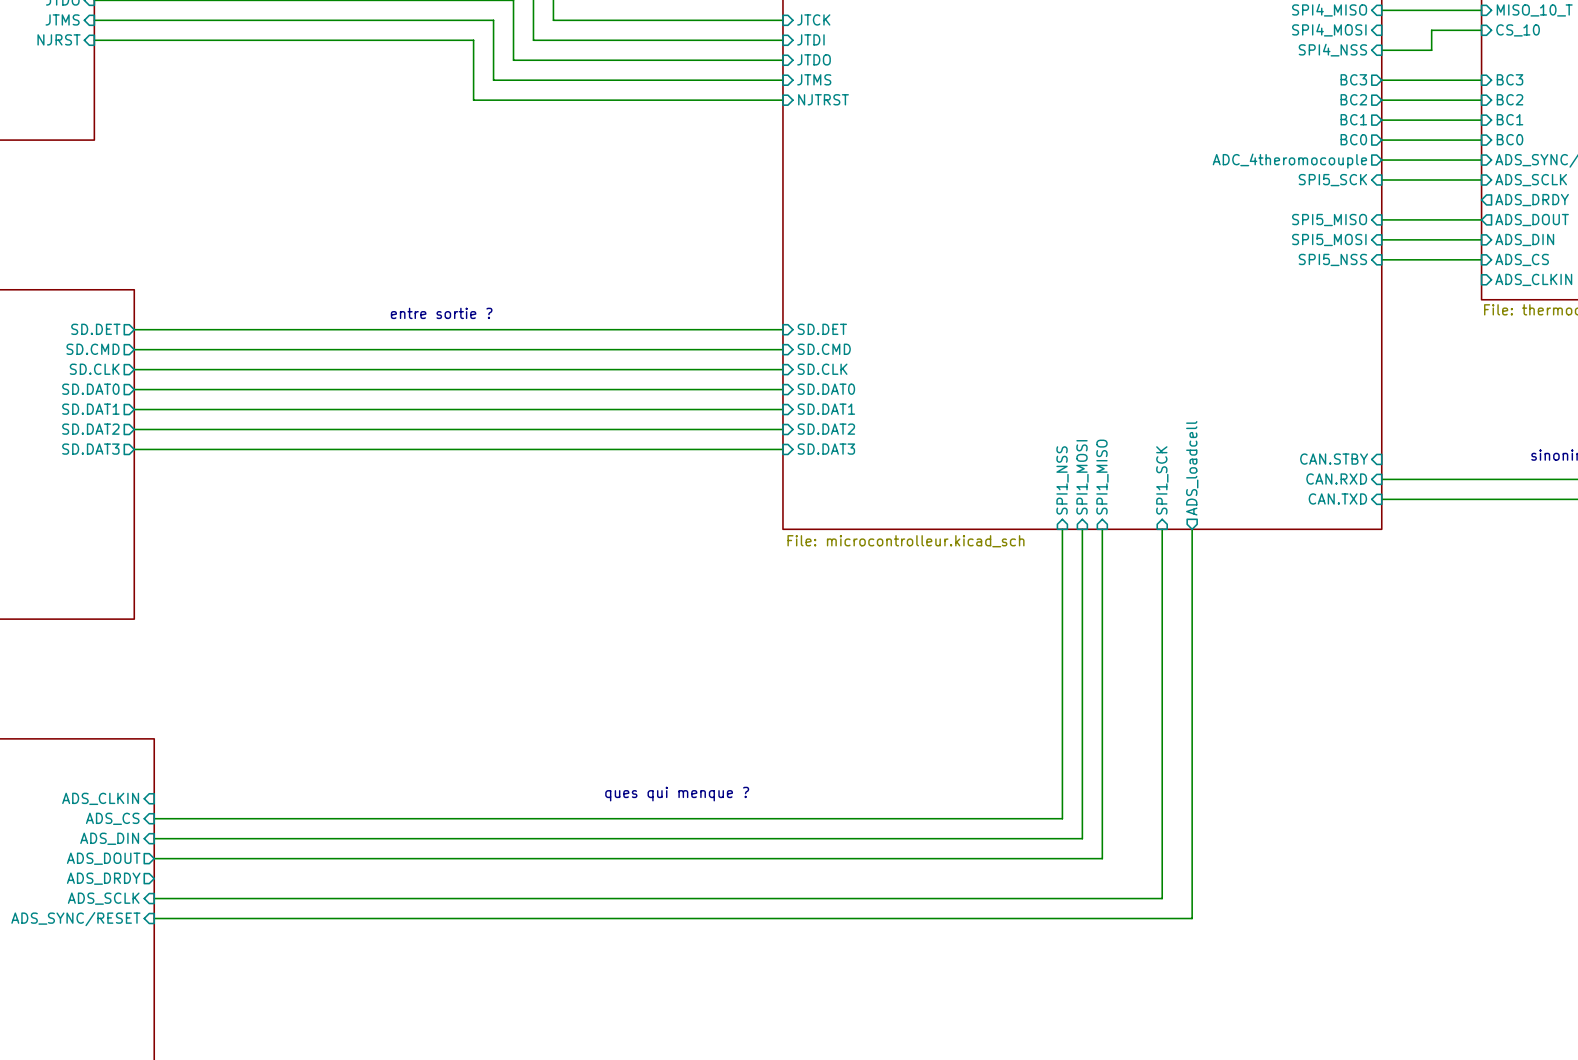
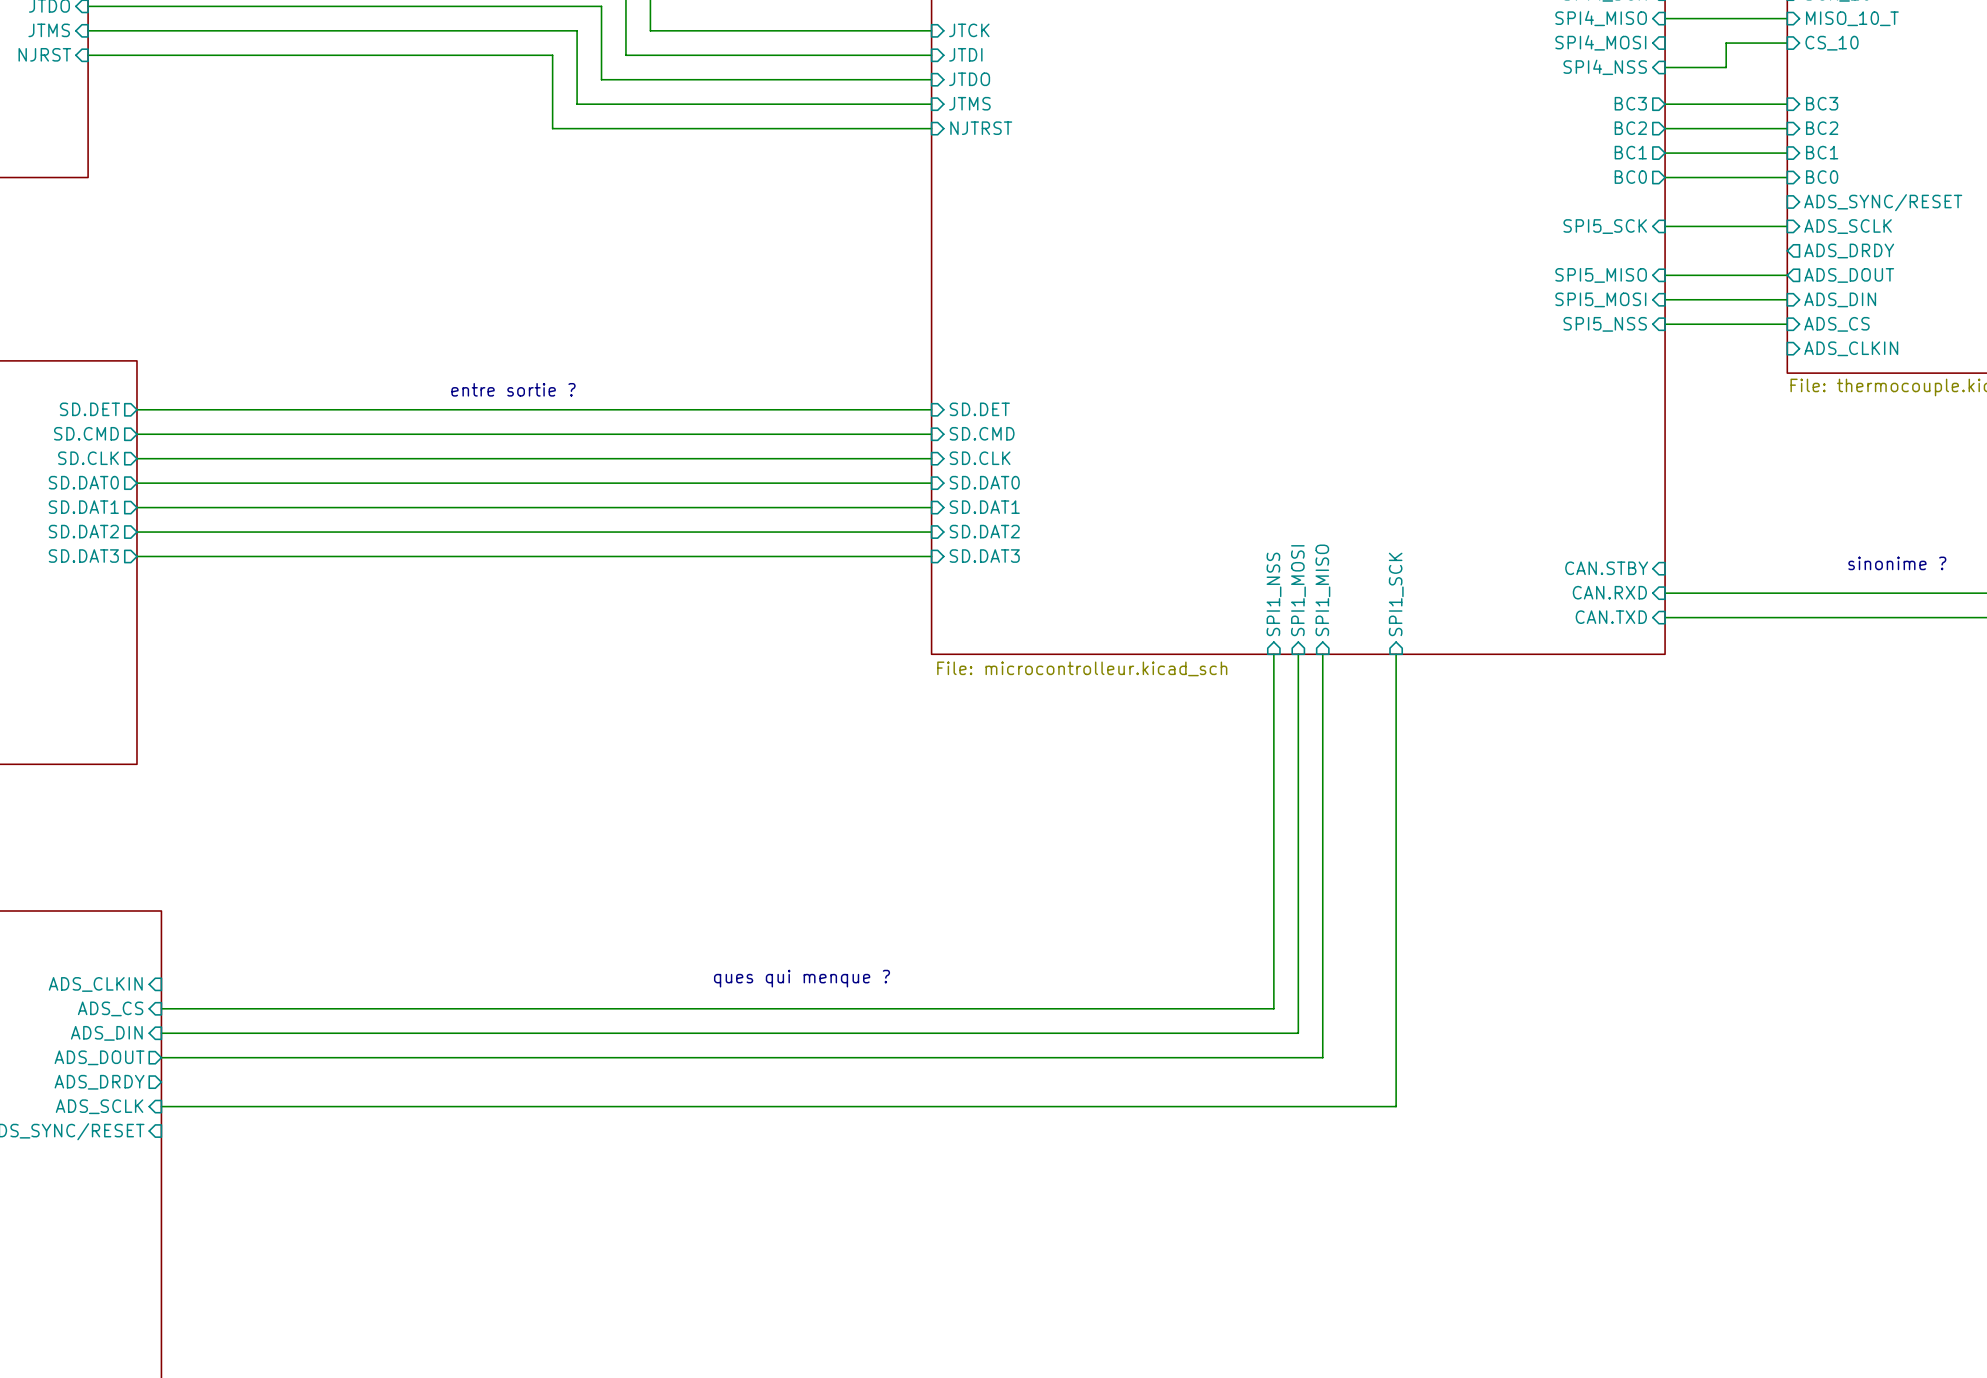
wire: (1381, 160) (1481, 160) -> none
sheet pin: ADC_4theromocouple (1289, 161) -> none
sheet pin: ADS_loadcell (1192, 468) -> none
wire: (1192, 529) (1192, 918) (154, 918) -> none

